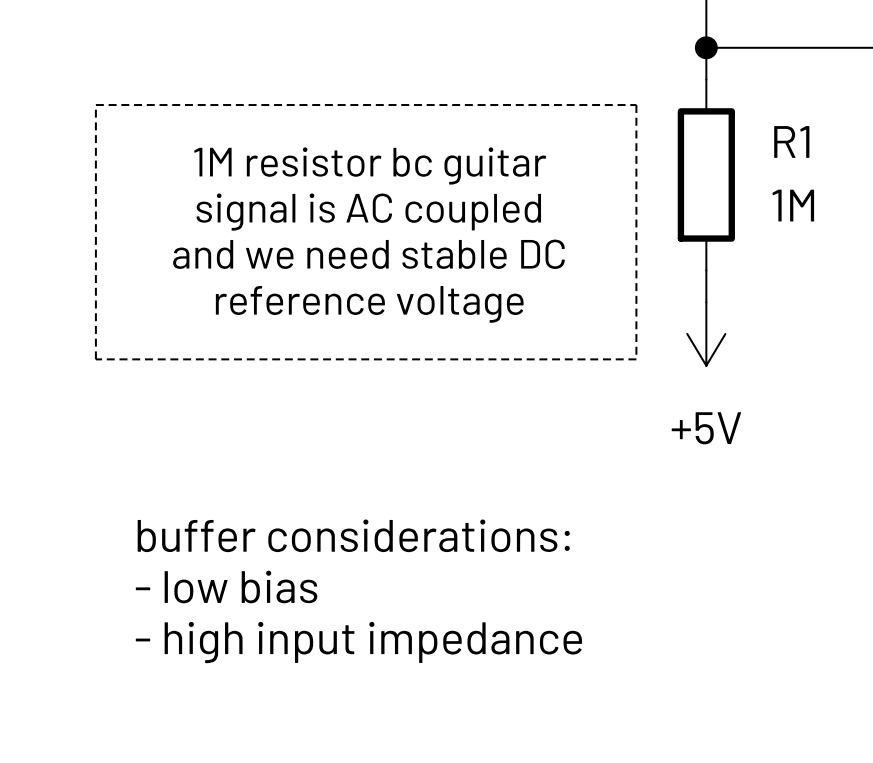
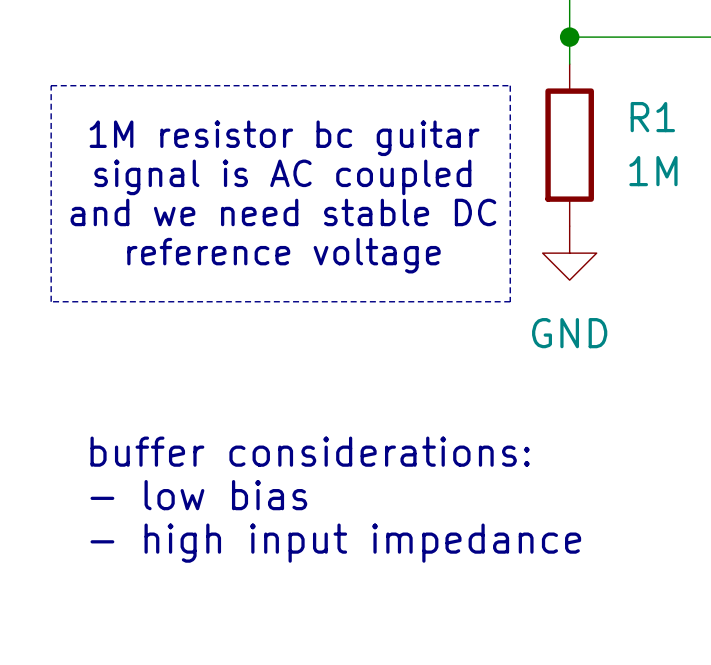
power symbol: none -> GND (569, 253)
power symbol: +5V (706, 333) -> none

